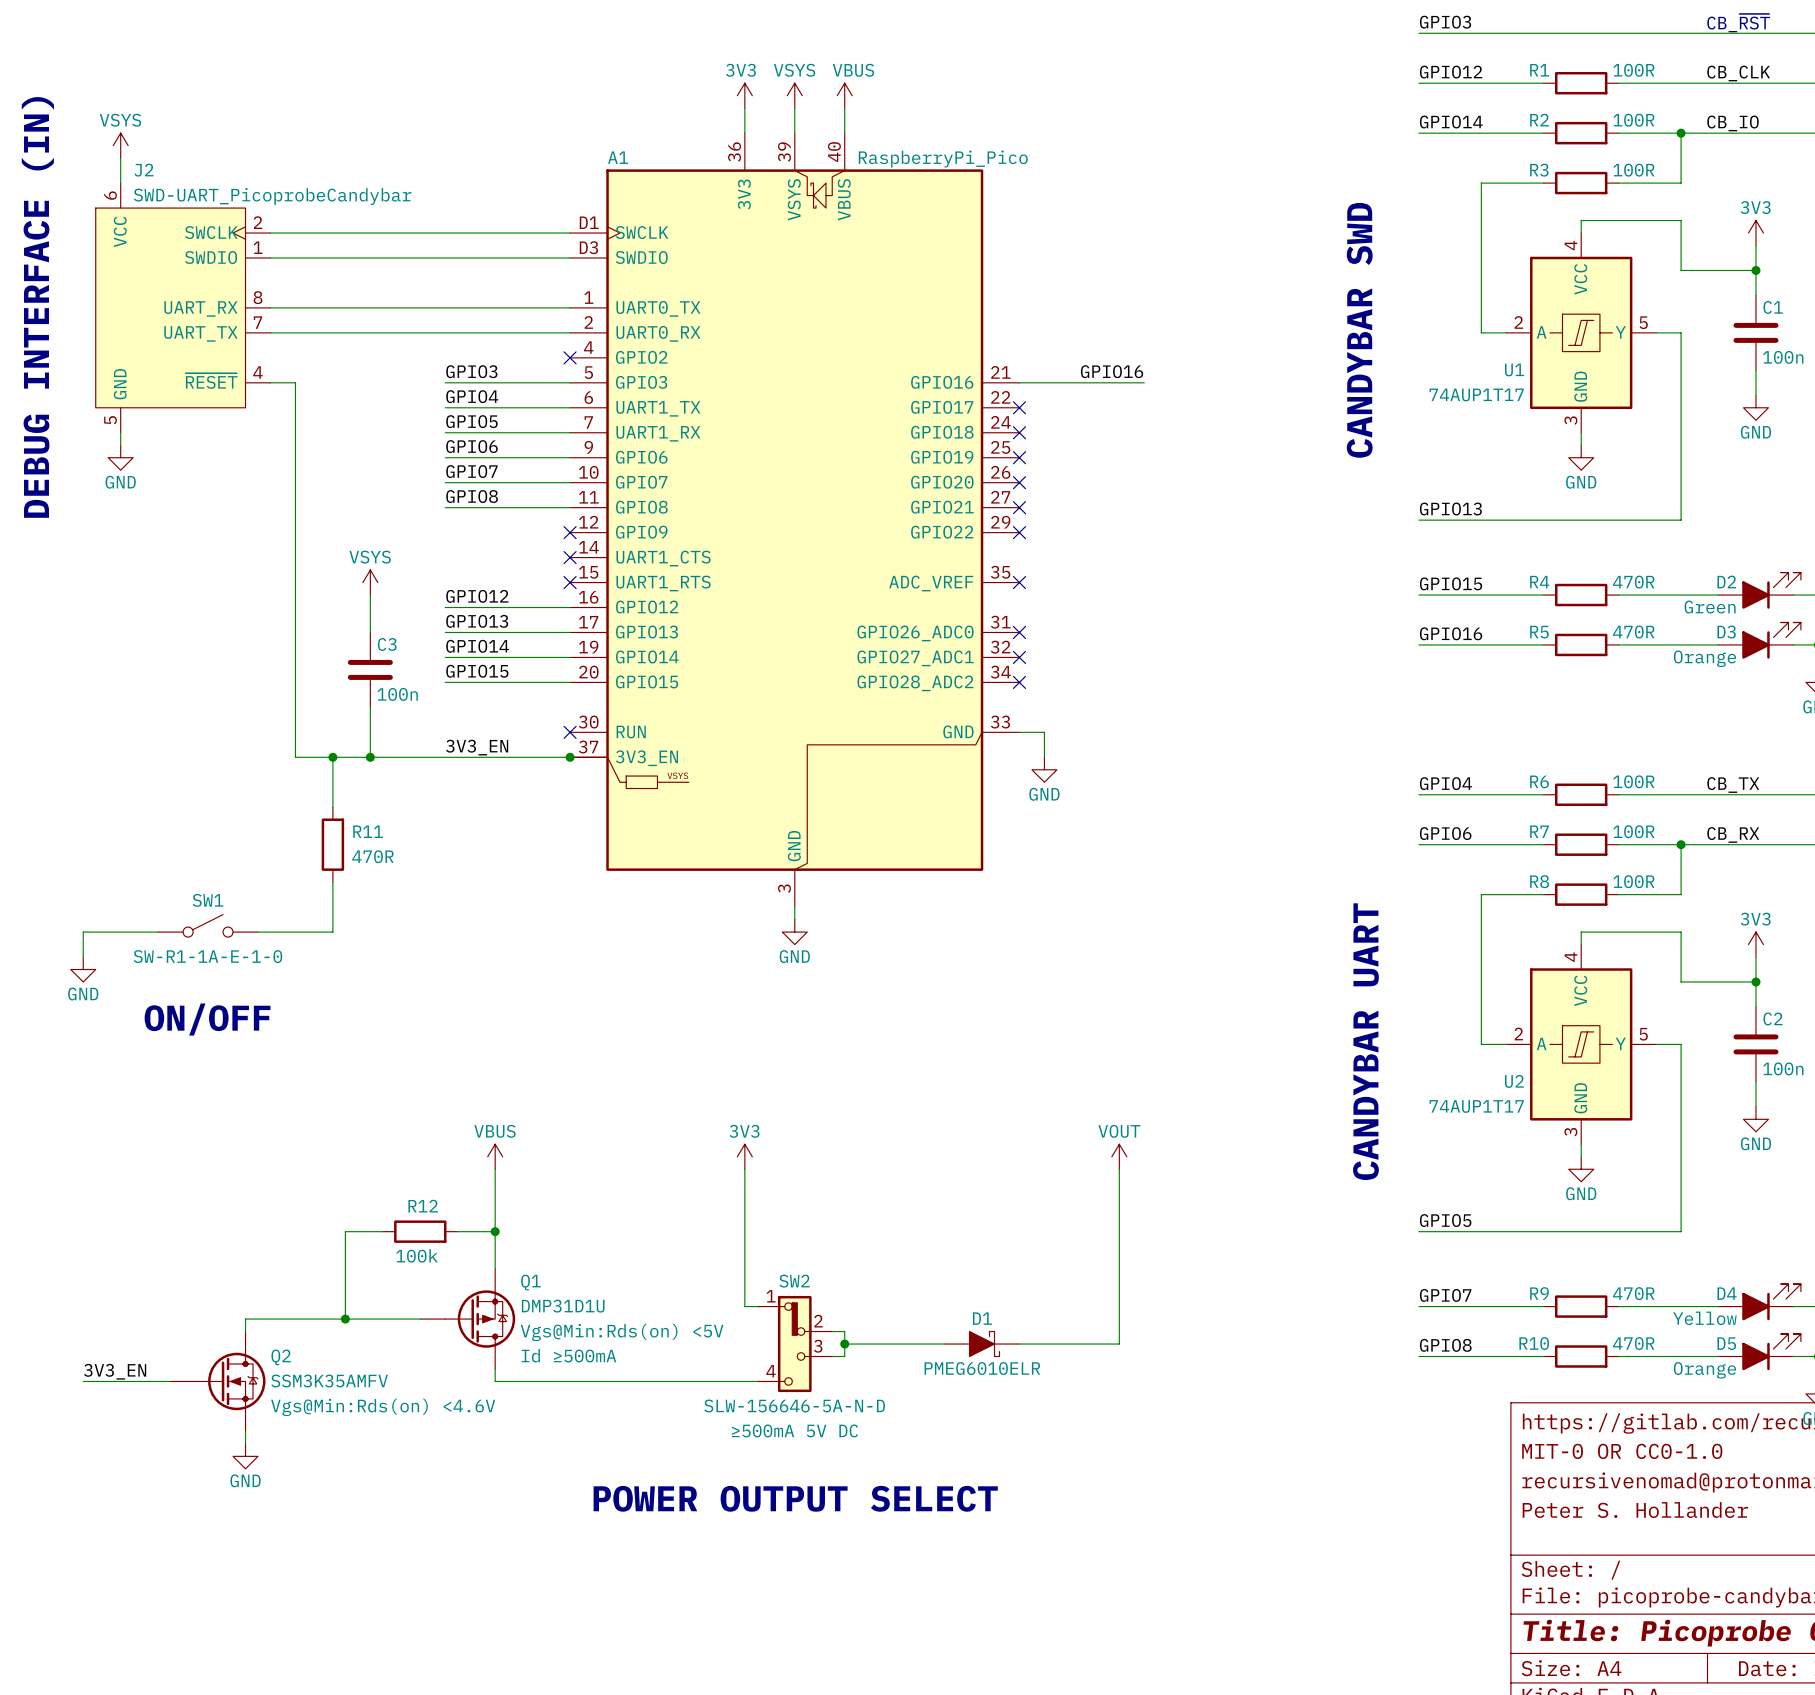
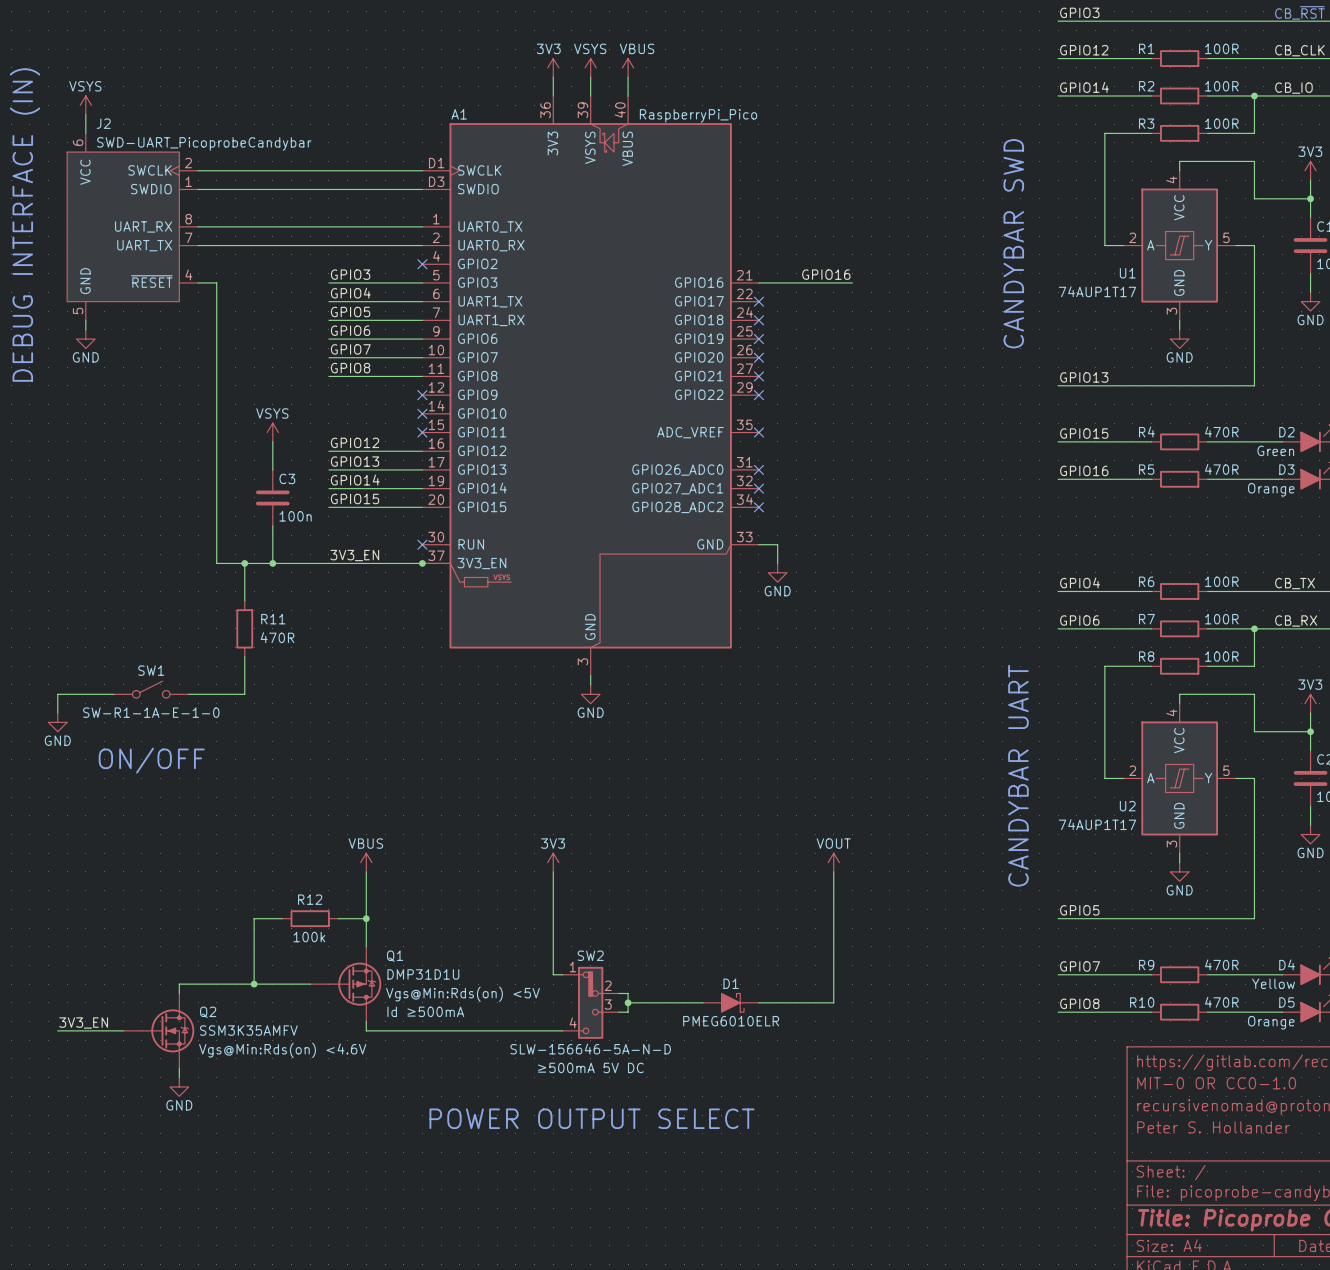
A1 pin name: UART1_CTS (663, 558) -> GPIO10 (482, 413)
A1 pin name: UART1_RTS (663, 583) -> GPIO11 (482, 432)

